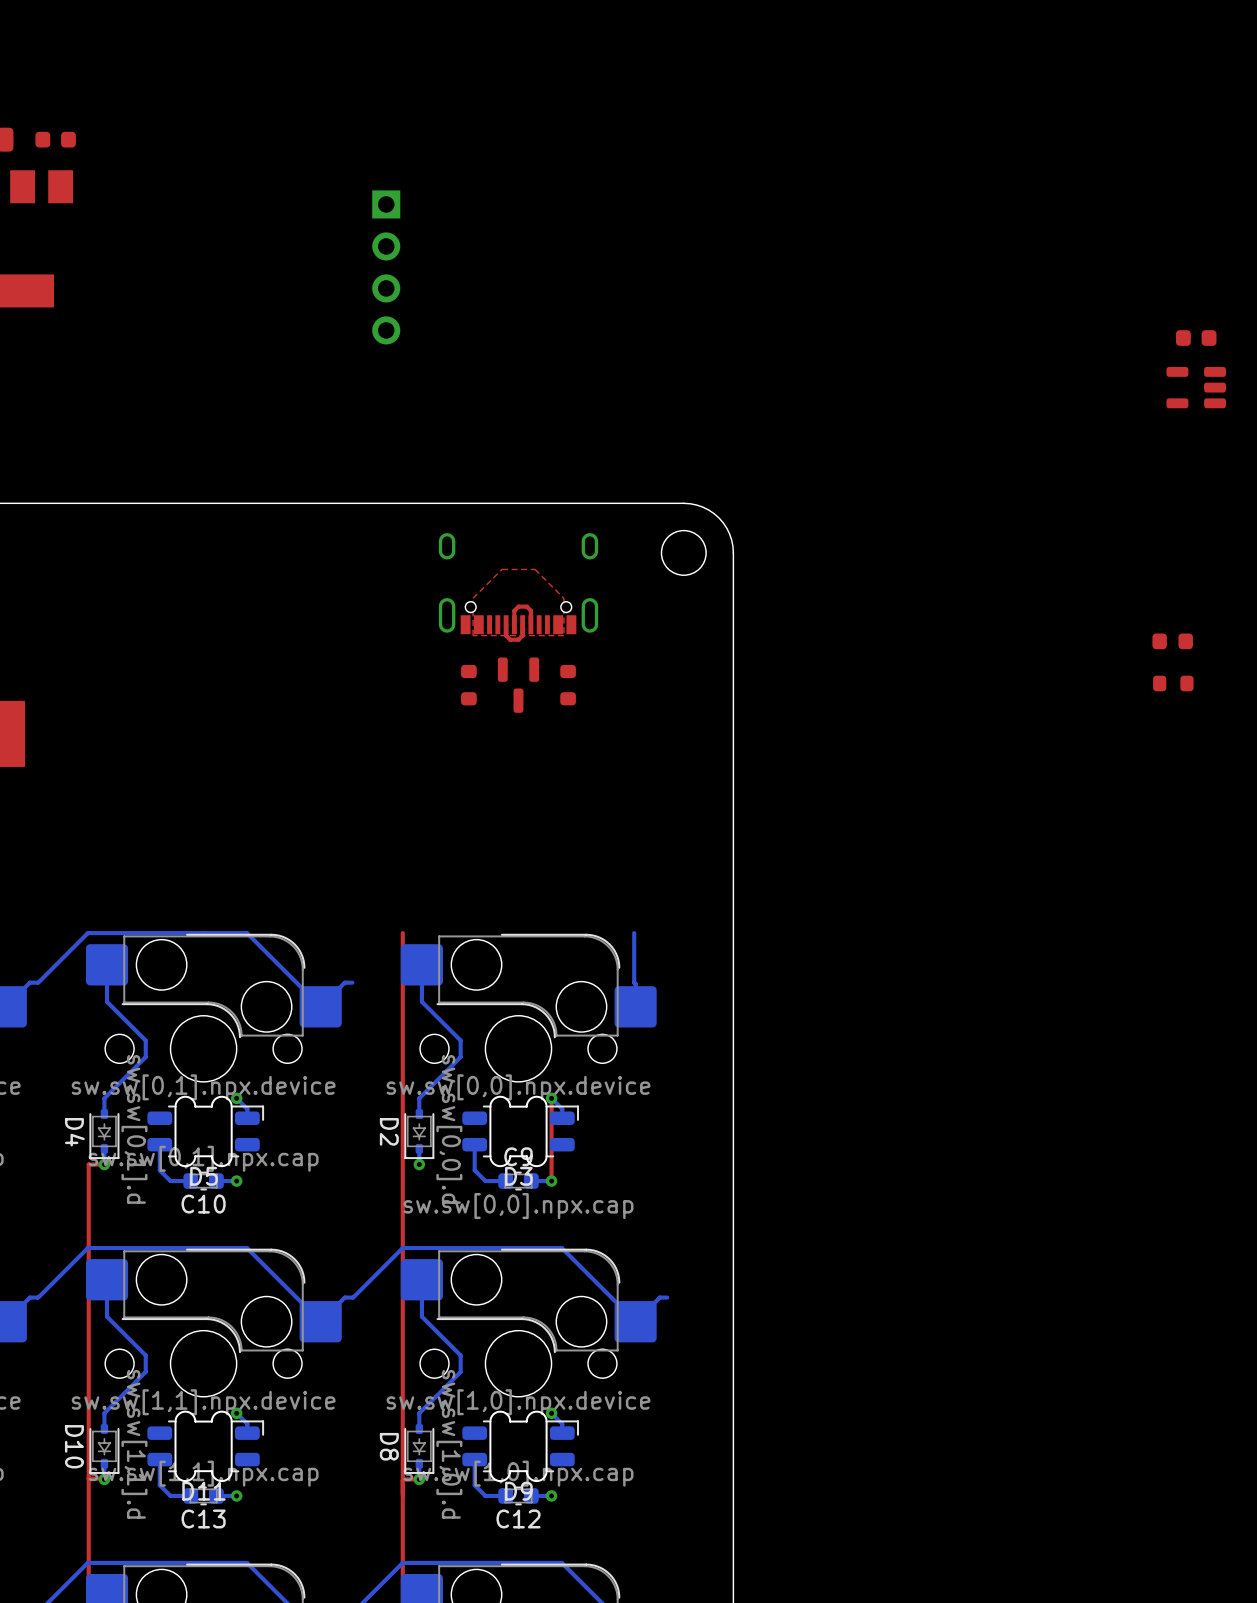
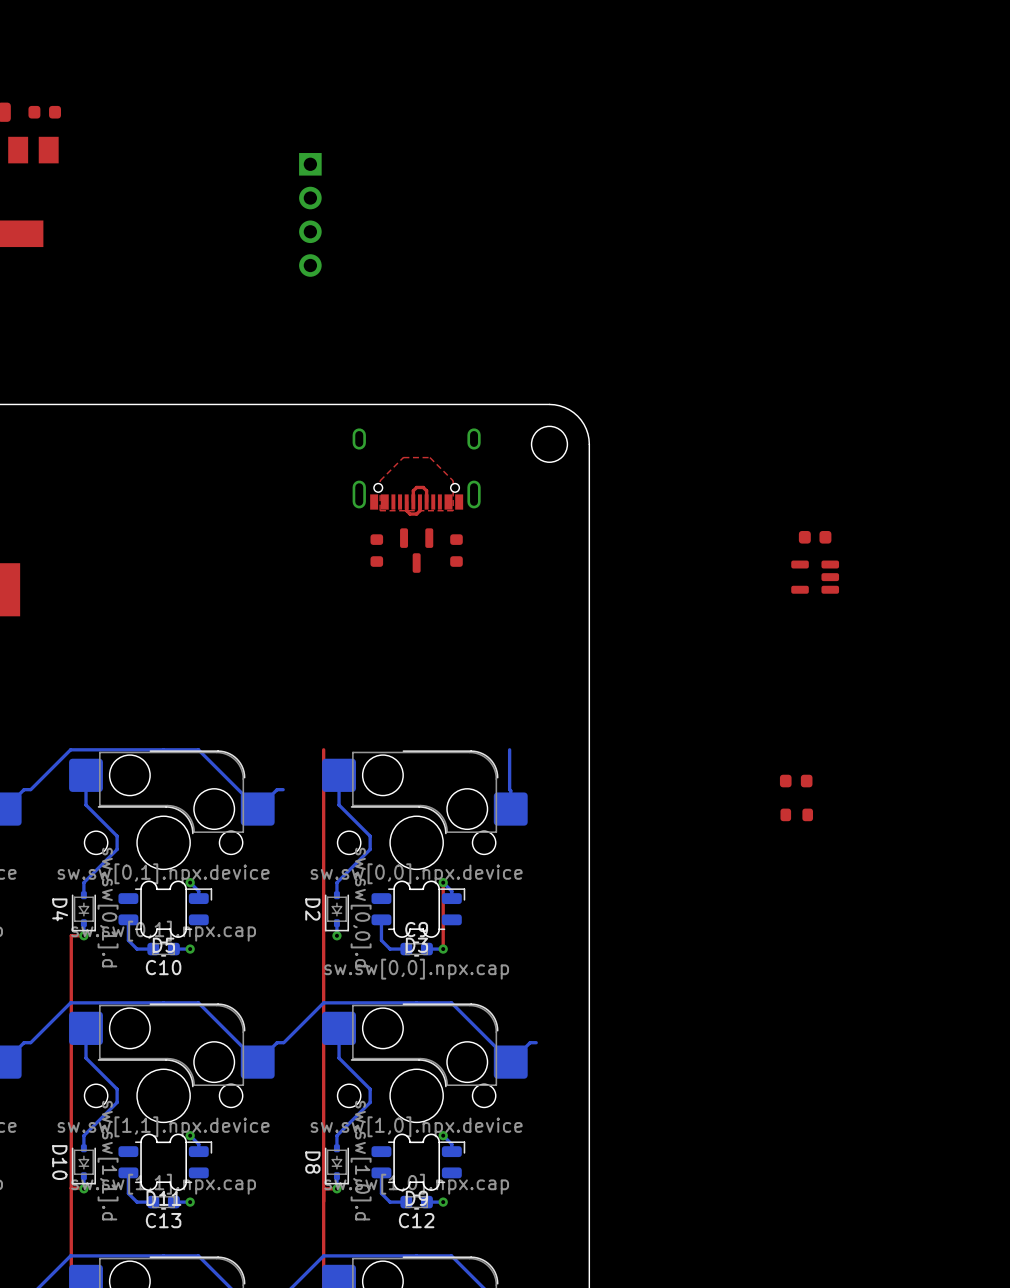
part position: (1196, 338) -> (815, 537)
part position: (1196, 387) -> (815, 577)
part position: (1172, 641) -> (796, 781)
part position: (1173, 683) -> (796, 814)

